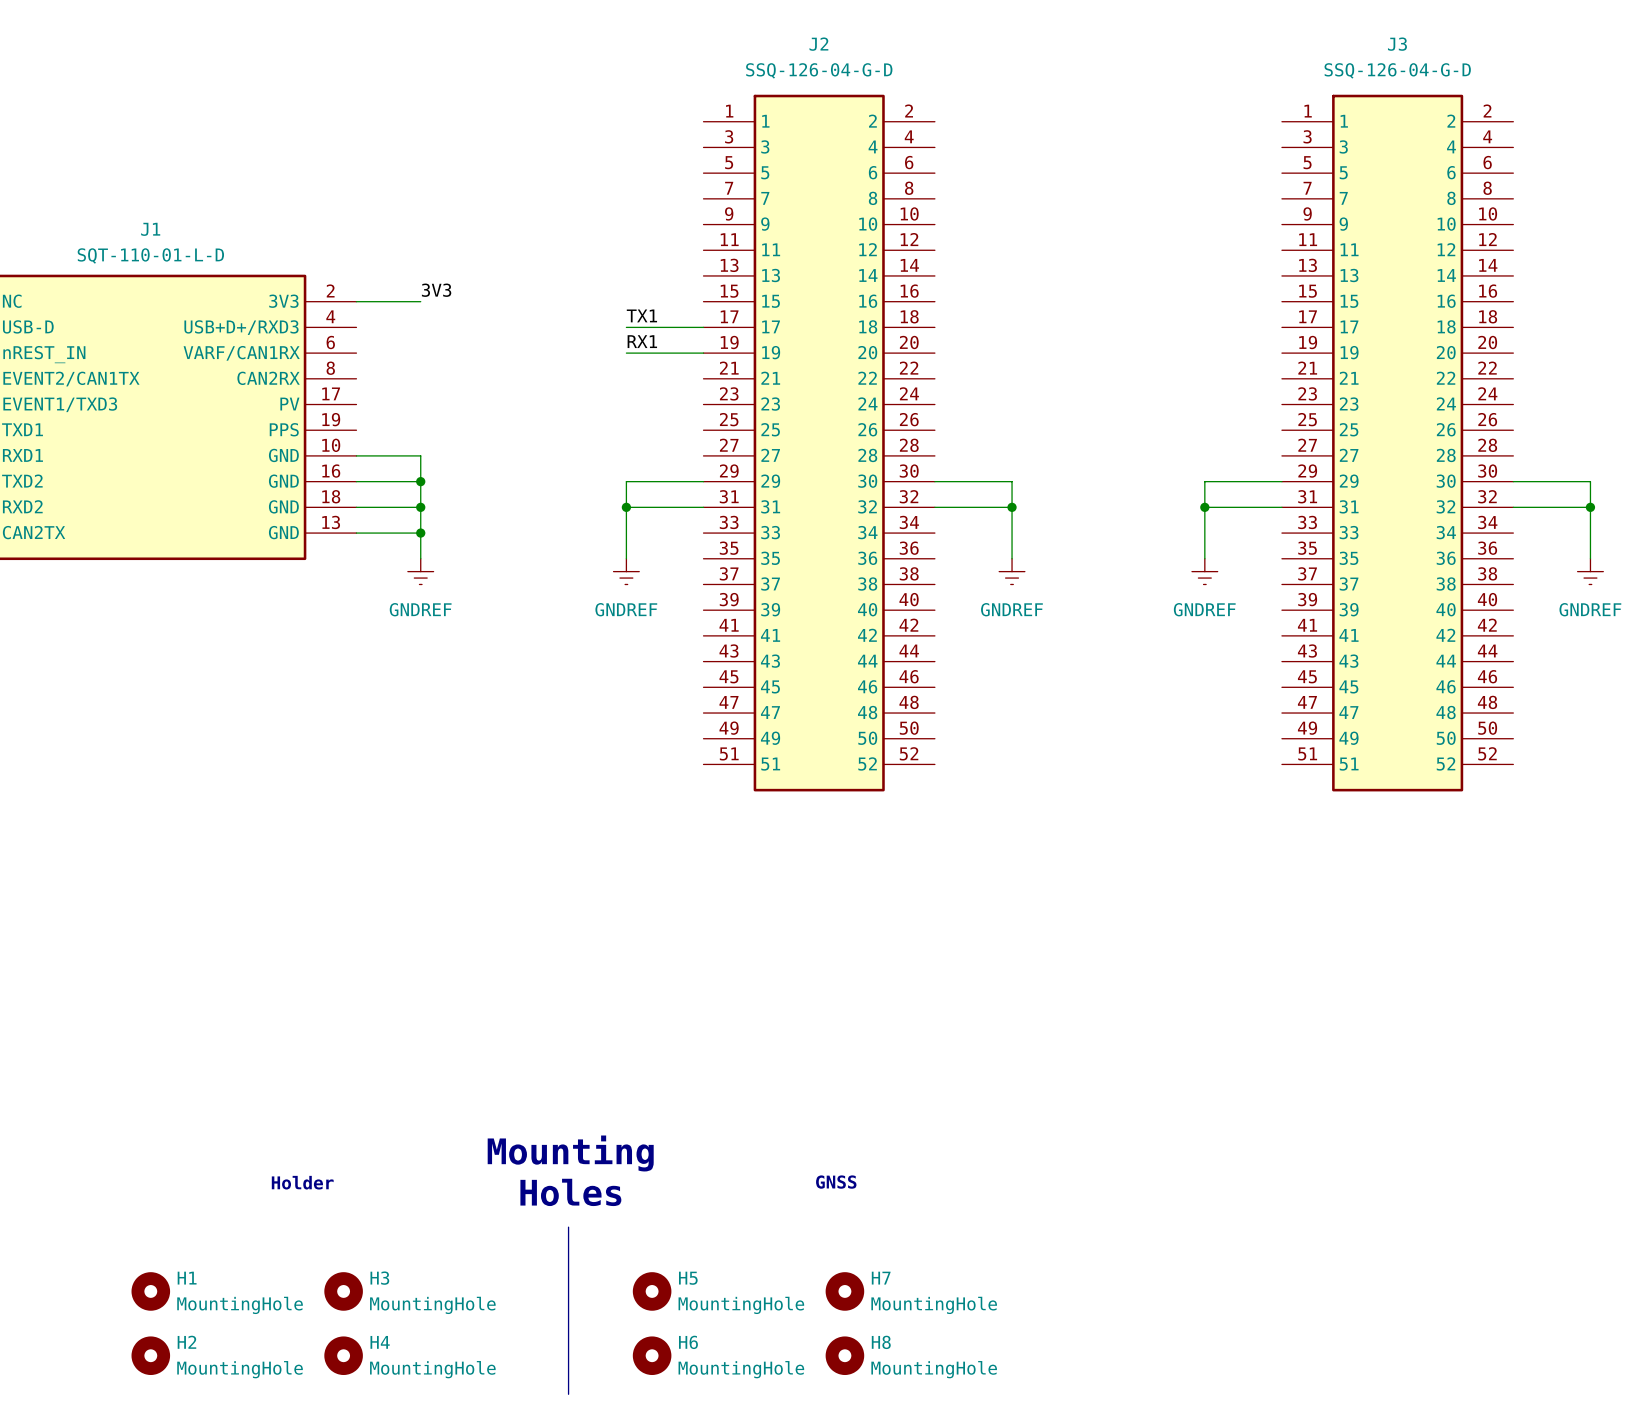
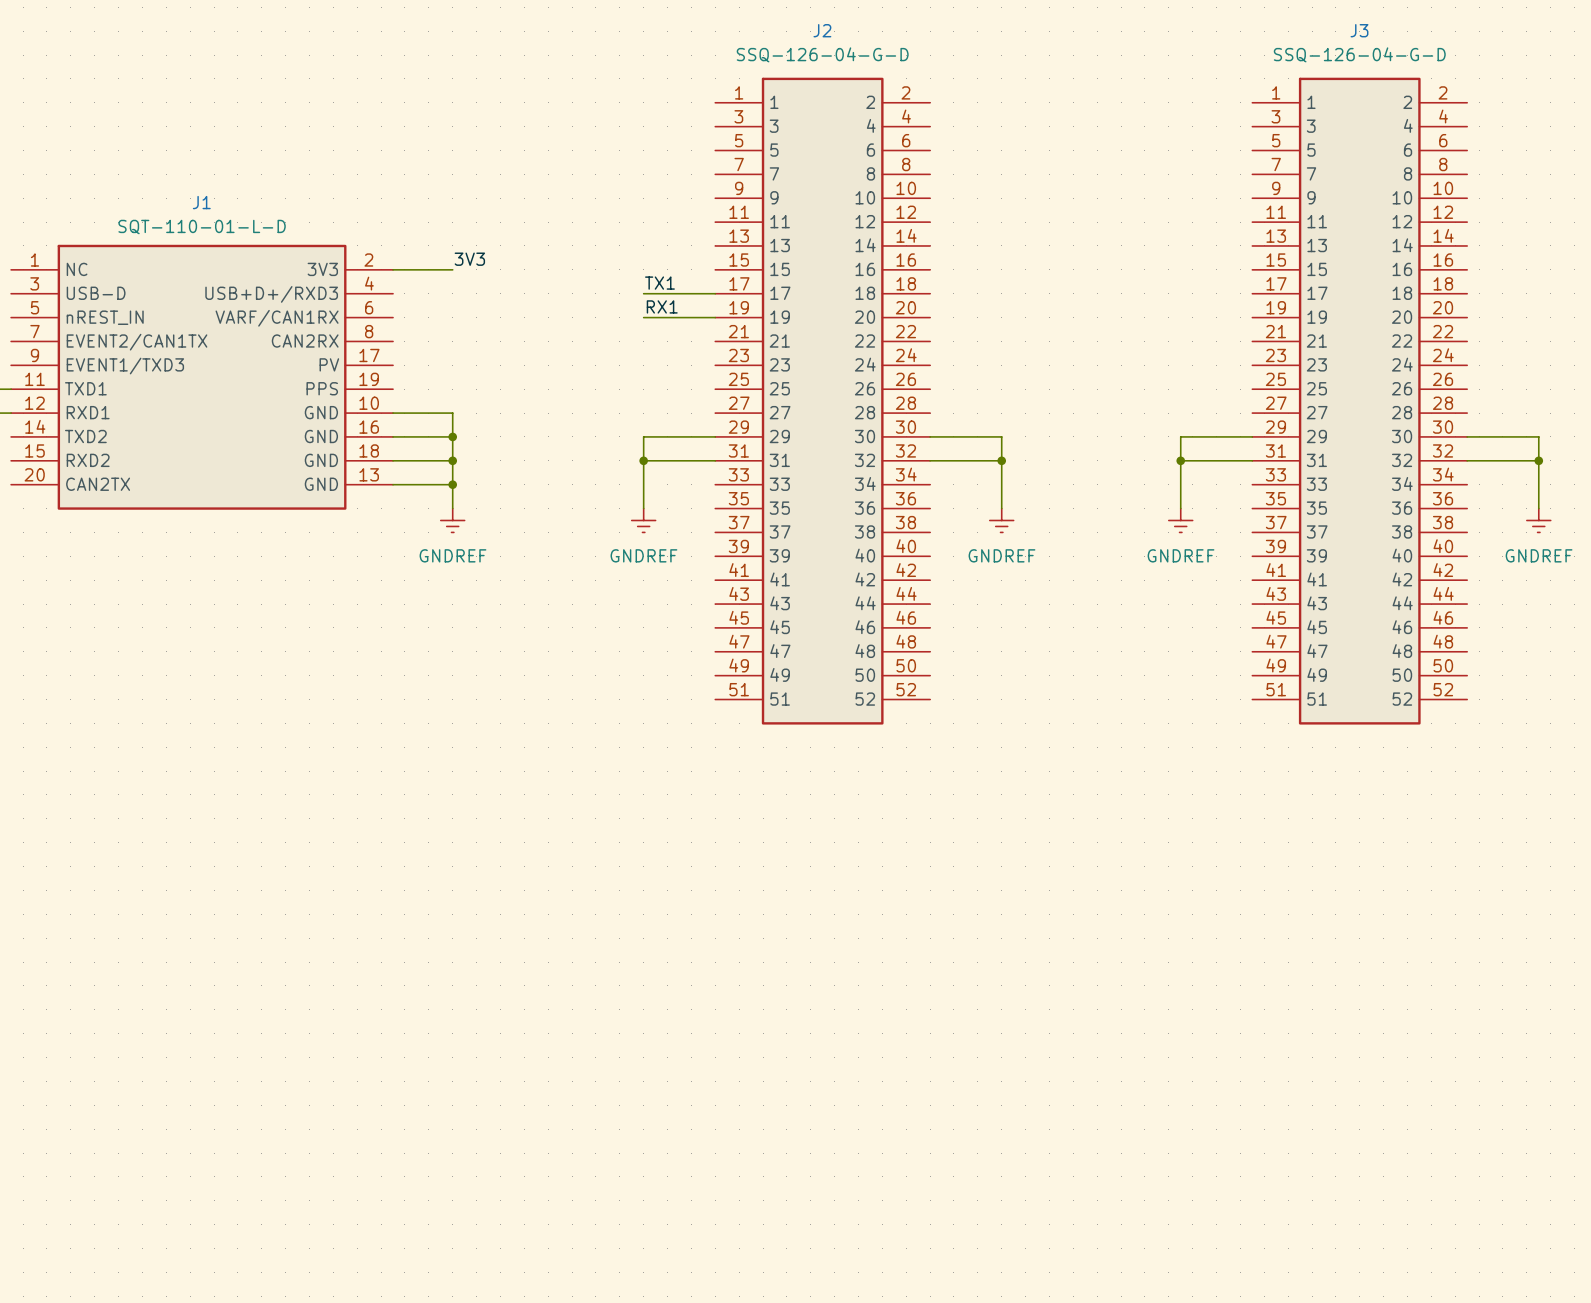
text: Mounting (570, 1153) -> none
text: Holder (302, 1182) -> none
text: GNSS (836, 1182) -> none
text: Holes (570, 1192) -> none
line: (568, 1227) (568, 1394) -> none
H1: MountingHole (150, 1291) -> none
H3: MountingHole (343, 1291) -> none
H5: MountingHole (652, 1291) -> none
H7: MountingHole (844, 1291) -> none
H2: MountingHole (150, 1355) -> none
H4: MountingHole (343, 1355) -> none
H6: MountingHole (652, 1355) -> none
H8: MountingHole (844, 1355) -> none

